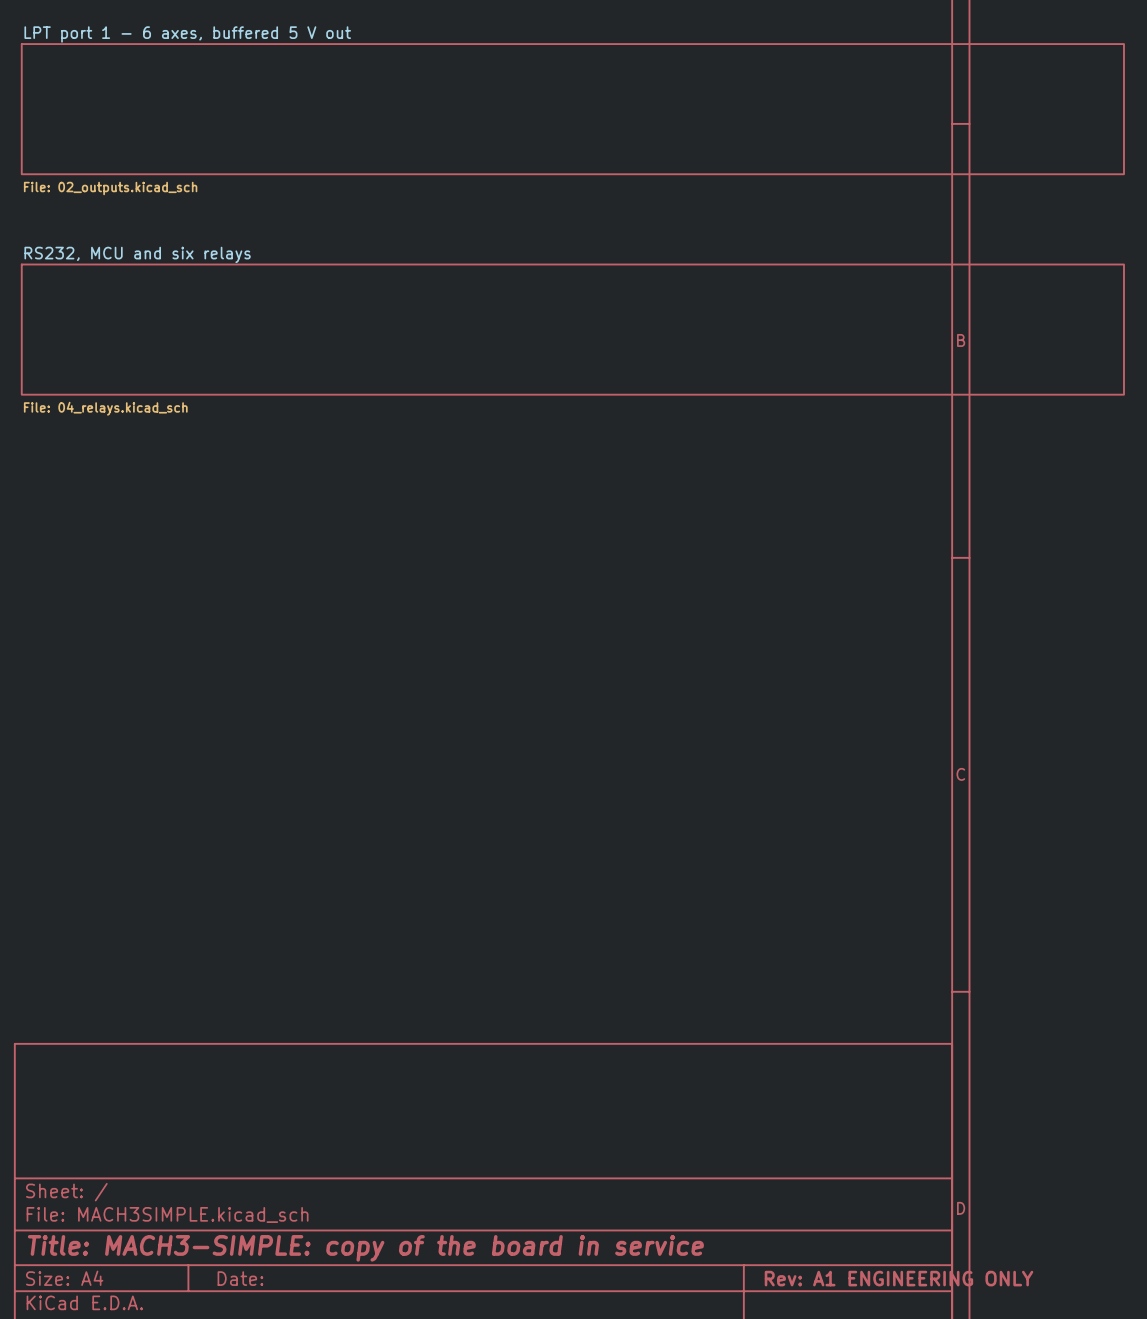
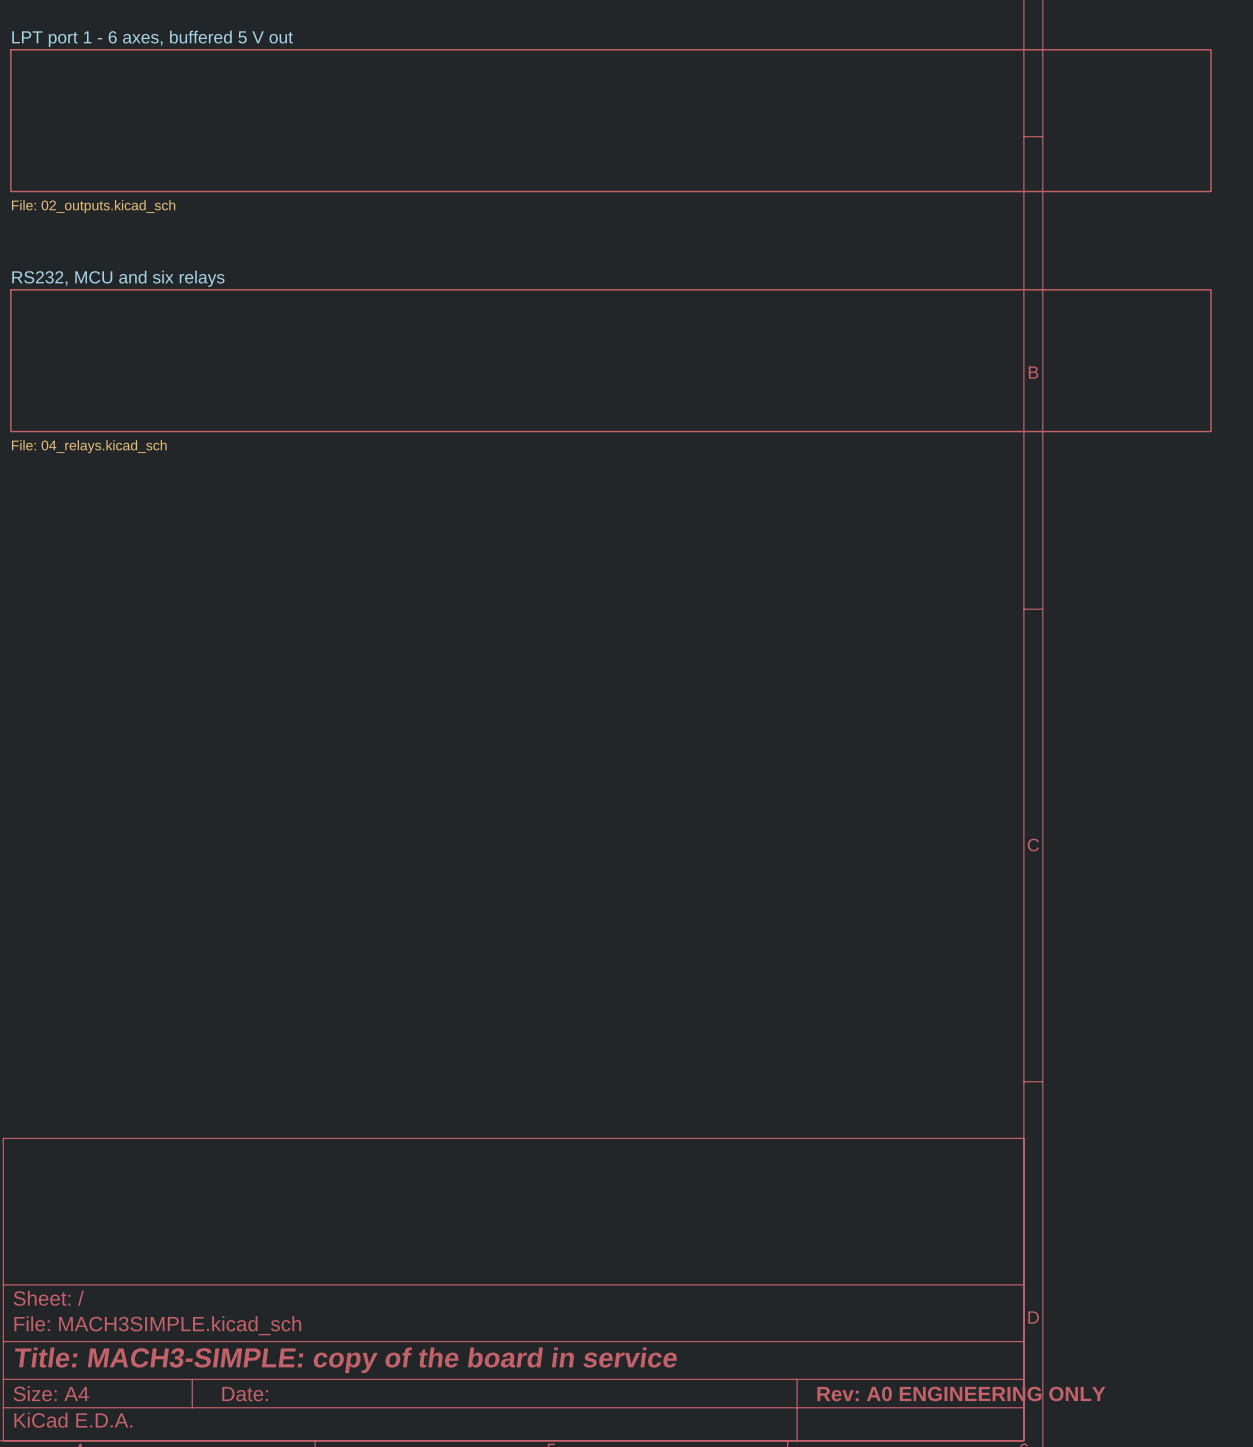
title block: Rev: A1 ENGINEERING ONLY (898, 1278) -> Rev: A0 ENGINEERING ONLY (961, 1393)

